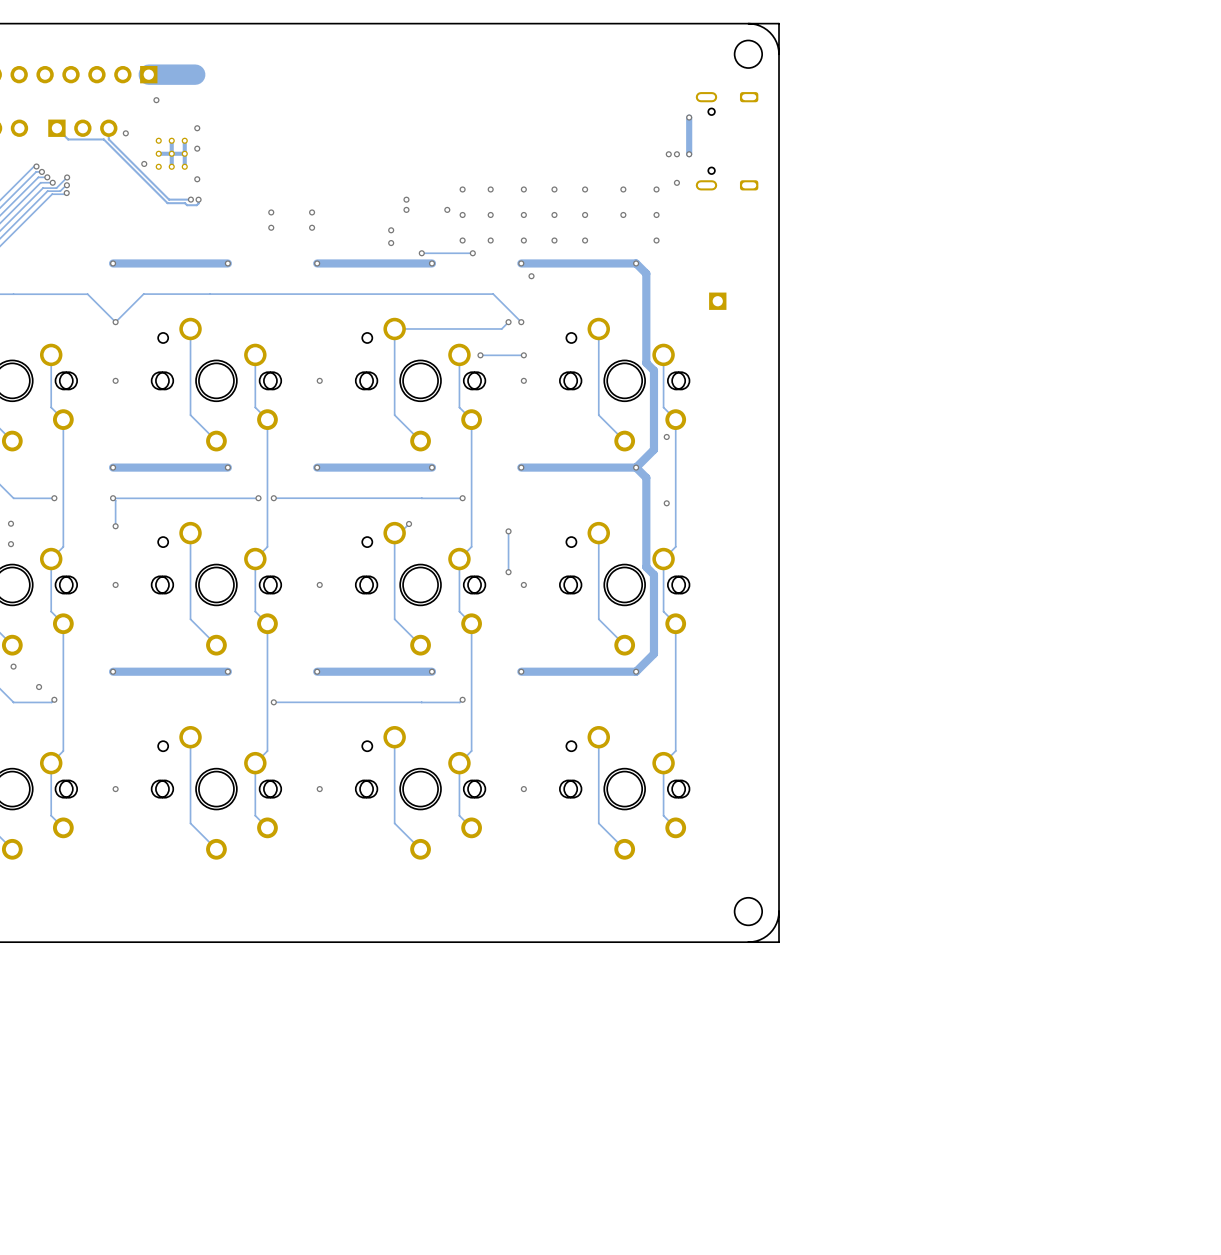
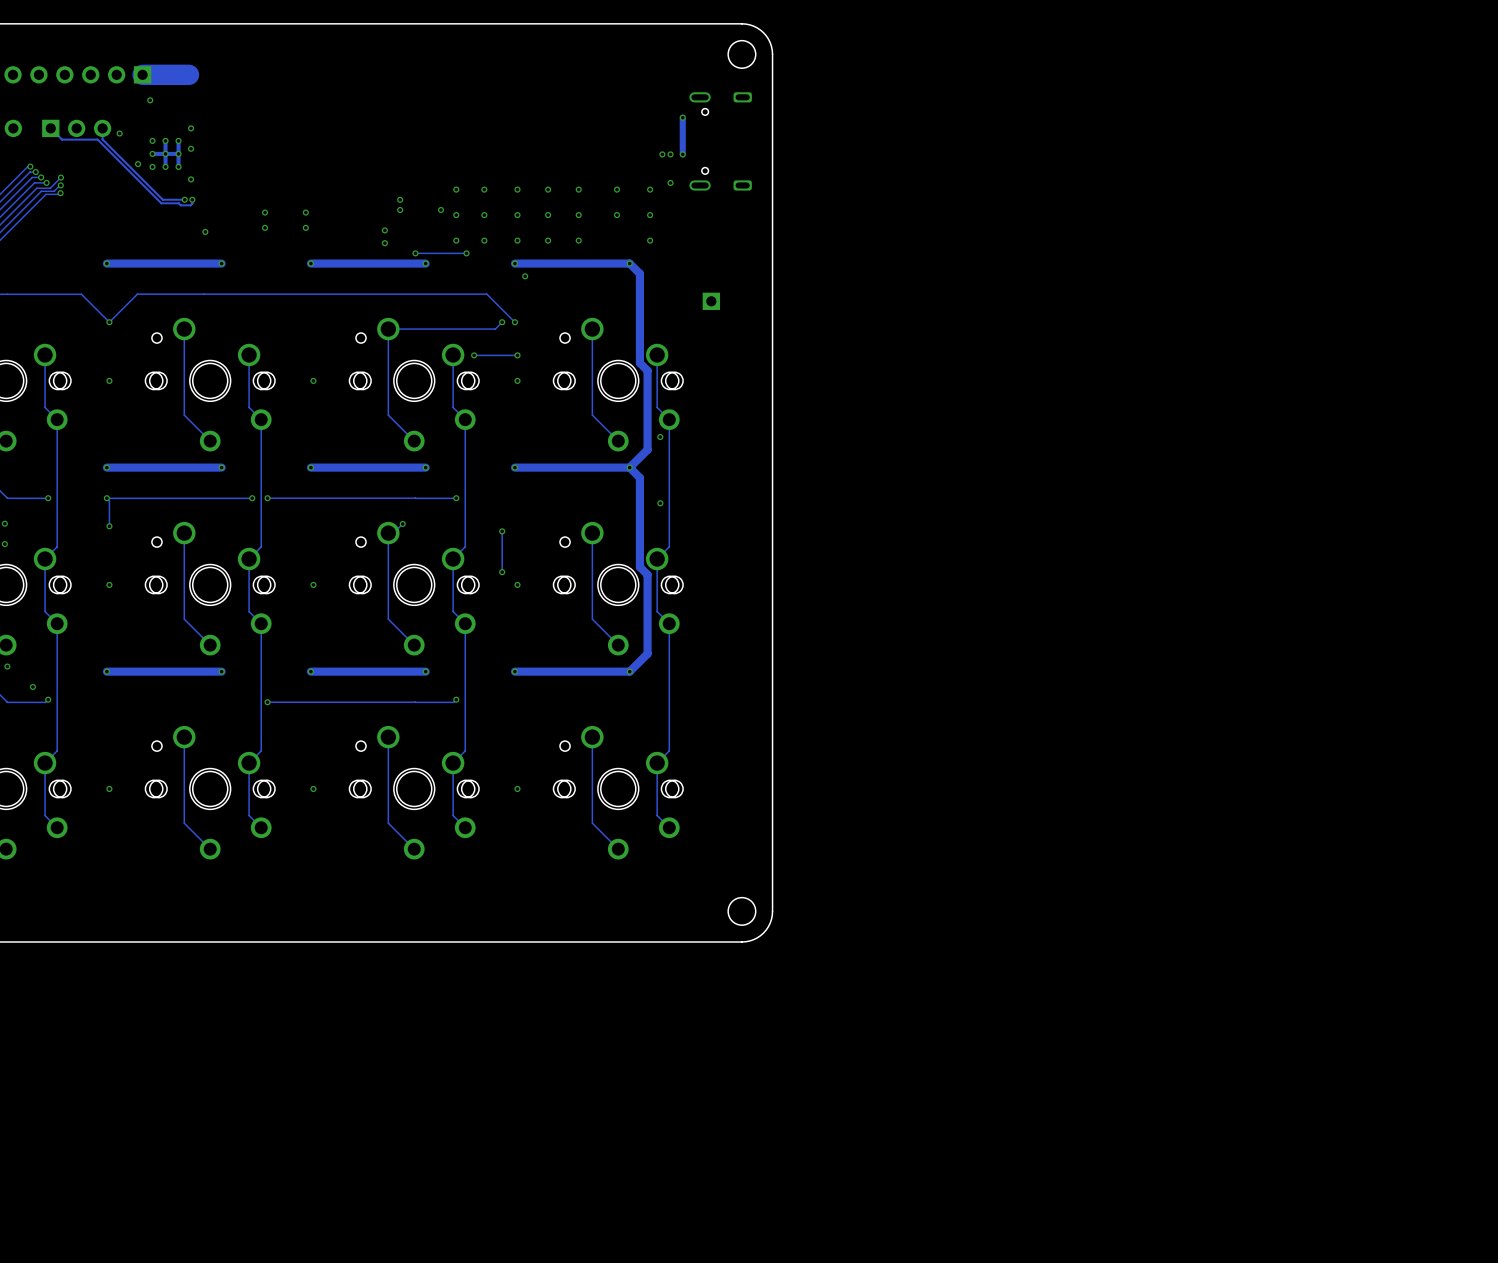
board edge: (748, 23) (779, 23) (779, 54) -> none
via: none -> (205, 231)
board edge: (779, 911) (779, 942) (748, 942) -> none

